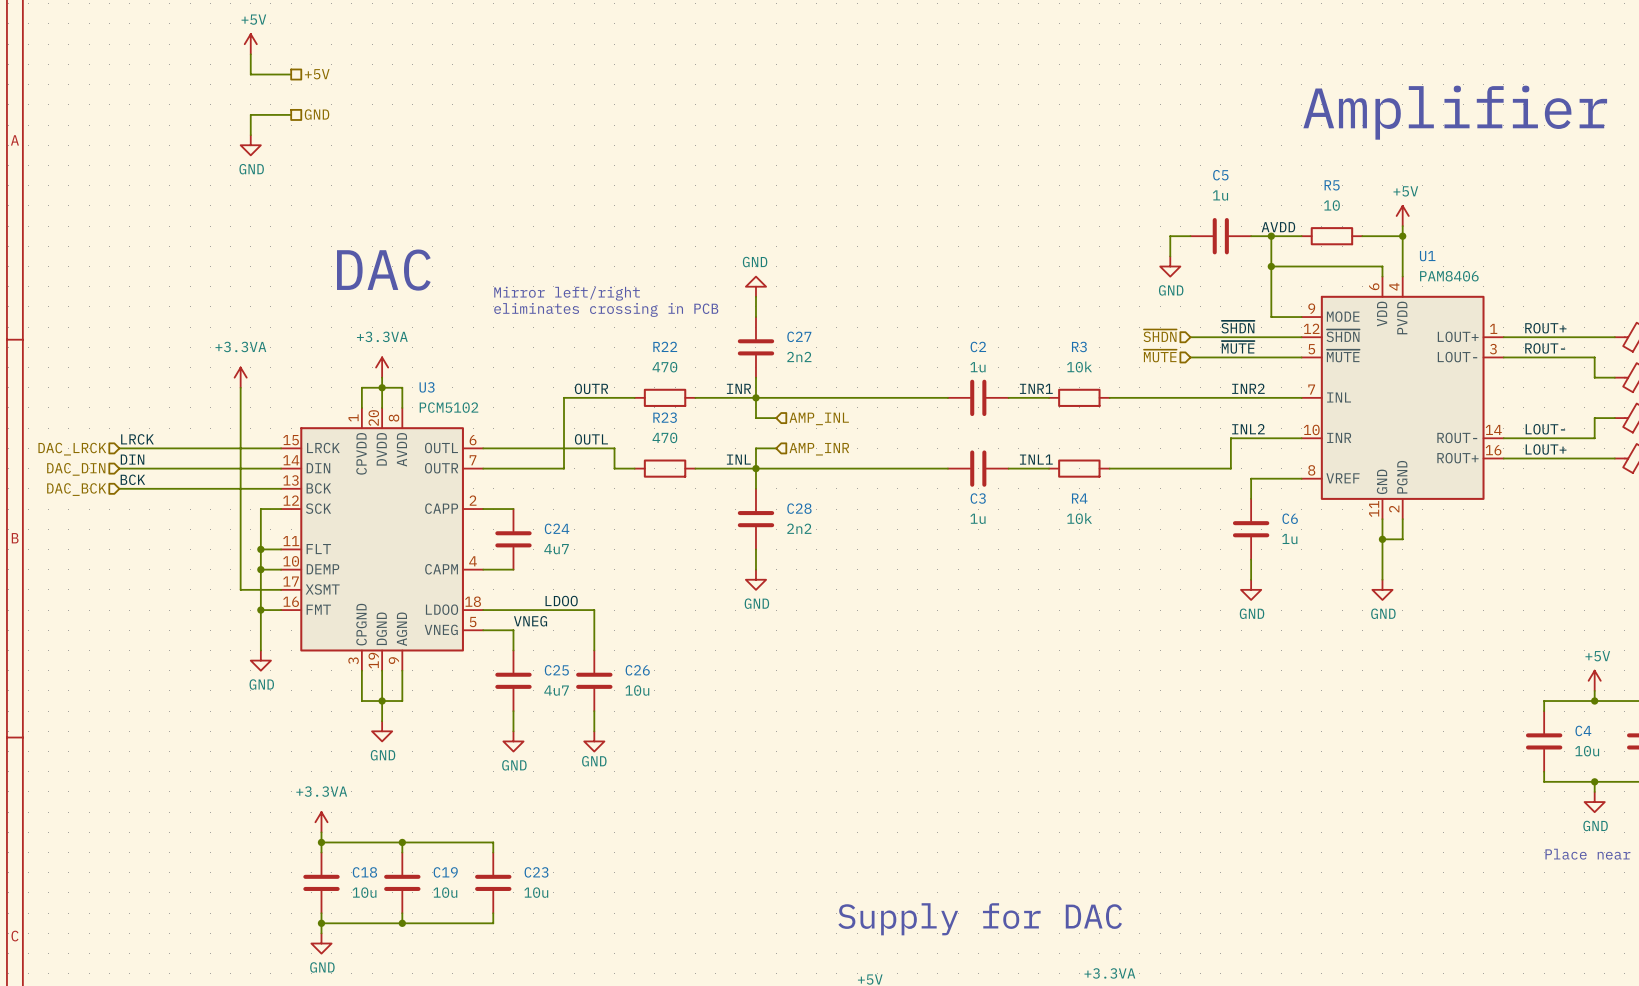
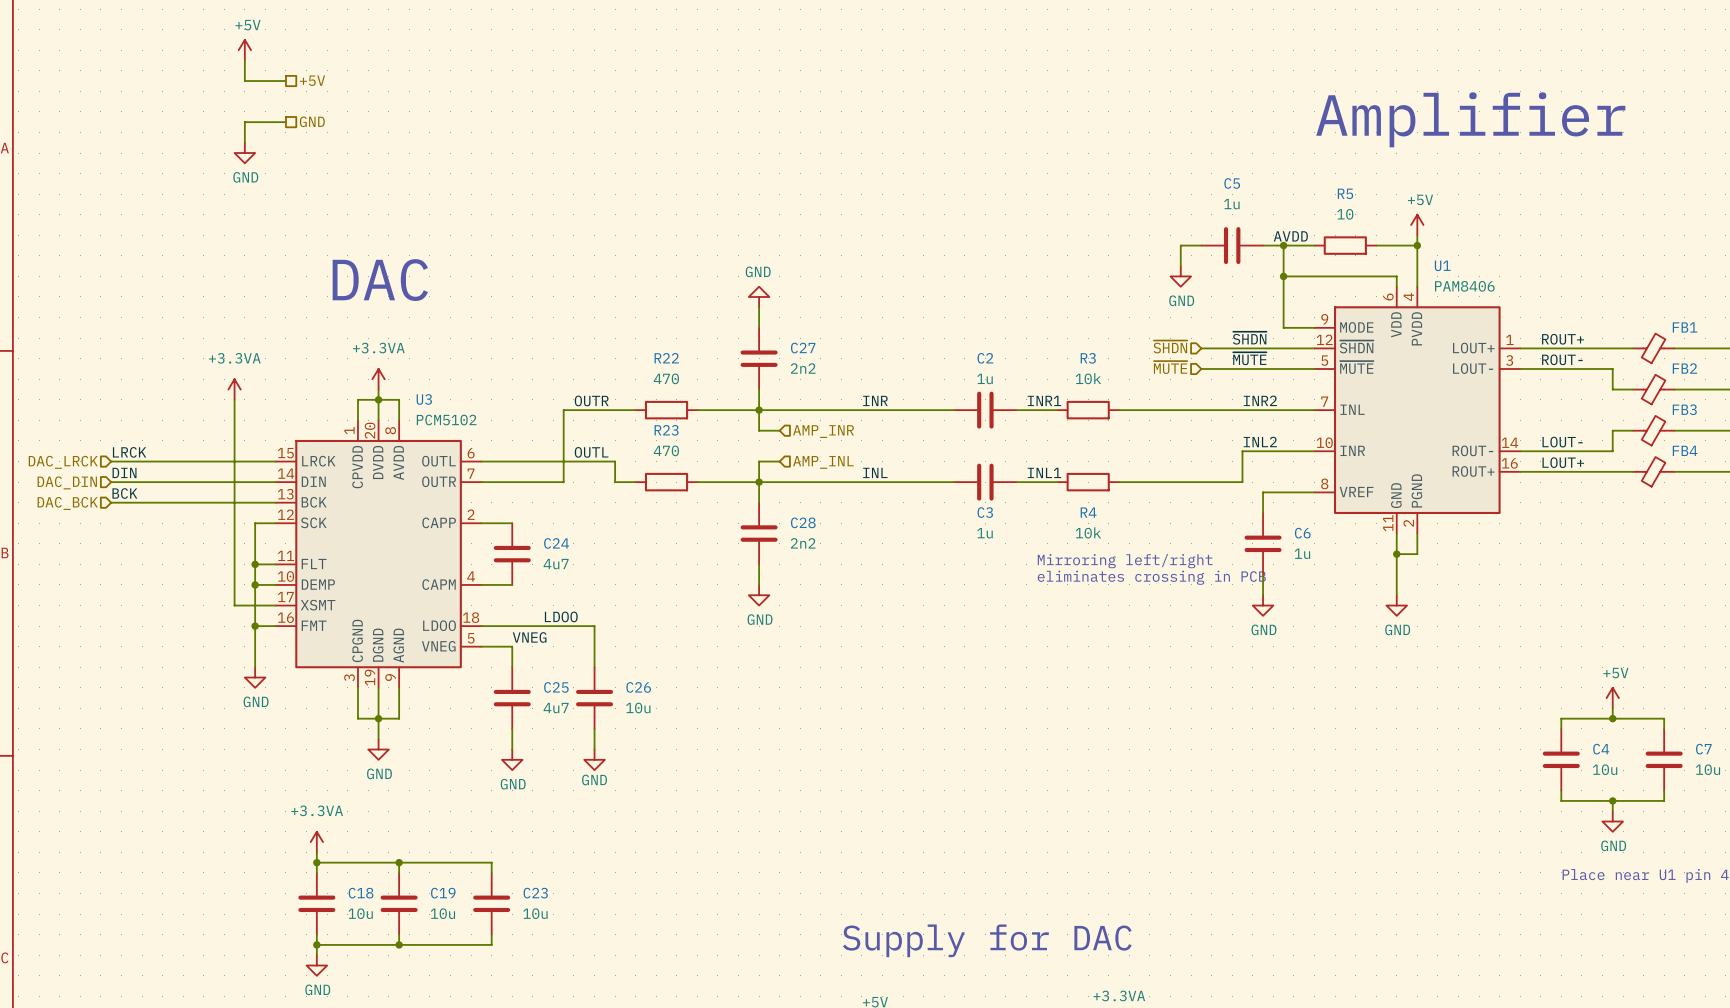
text: Mirror left/right (567, 293) -> none
text: eliminates crossing in PCB (606, 309) -> none
label position: INR (738, 388) -> INR (875, 400)
hierarchical label: AMP_INL (819, 418) -> AMP_INR (823, 431)
hierarchical label: AMP_INR (819, 449) -> AMP_INL (823, 462)
label position: INL (738, 459) -> INL (875, 472)
text: none -> Mirroring left/right (1125, 561)
text: none -> eliminates crossing in PCB (1151, 577)

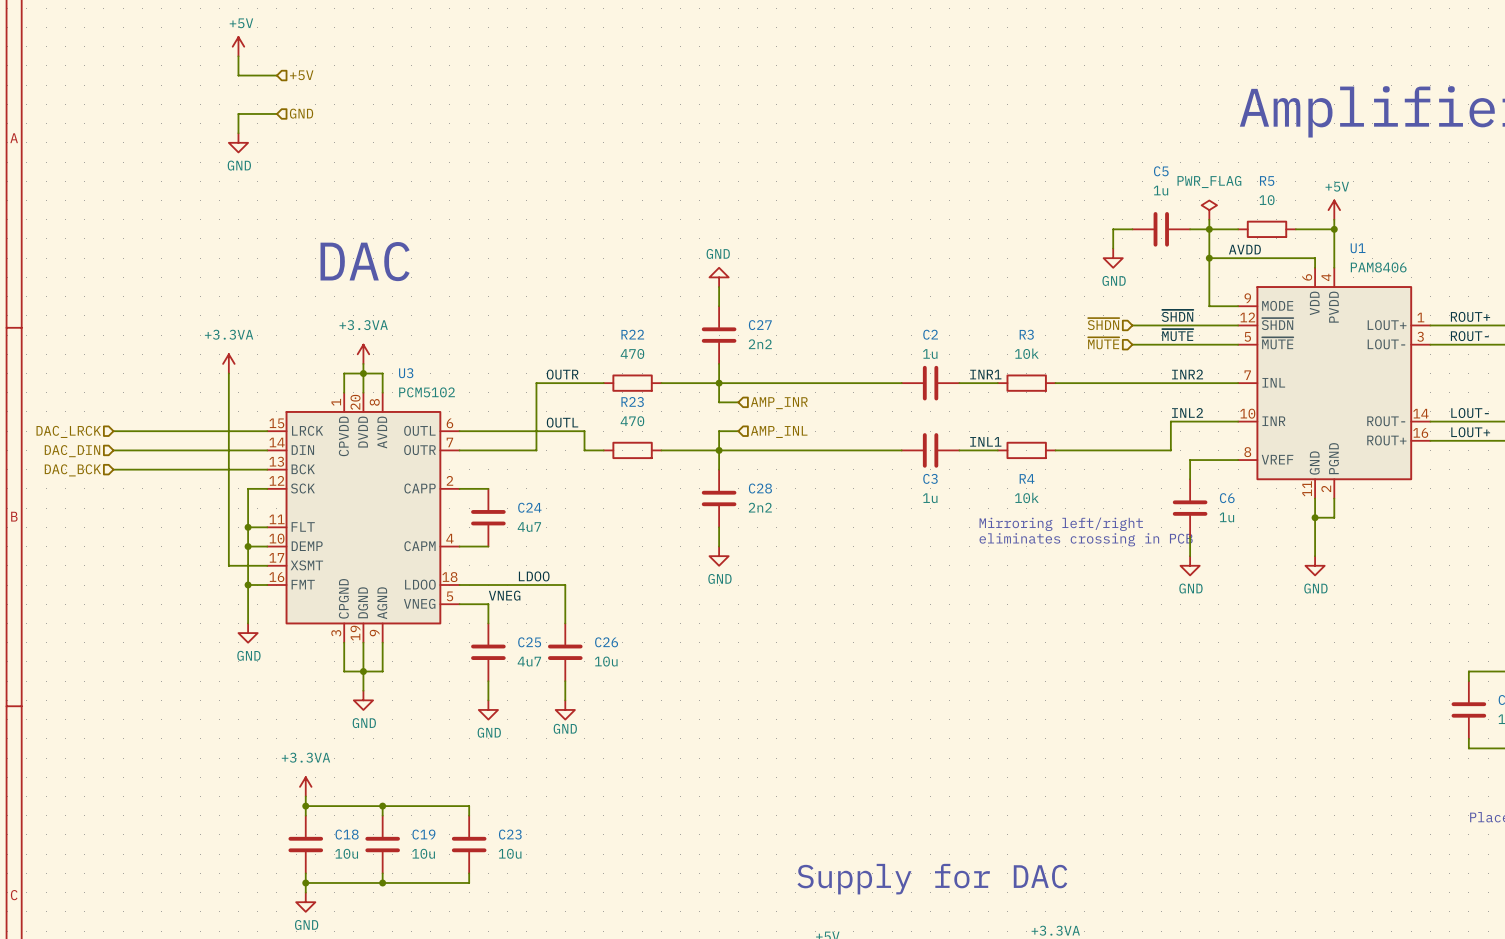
hierarchical label shape: passive (312, 80) -> input (301, 75)
hierarchical label shape: passive (312, 121) -> input (301, 113)
power symbol: none -> PWR_FLAG (1209, 210)
wire: none -> (1209, 219) (1209, 229)
label position: AVDD (1290, 236) -> AVDD (1244, 249)
label: INR (875, 400) -> none
label: LRCK (129, 452) -> none
label: DIN (124, 472) -> none
label: INL (875, 472) -> none
label: BCK (124, 493) -> none

